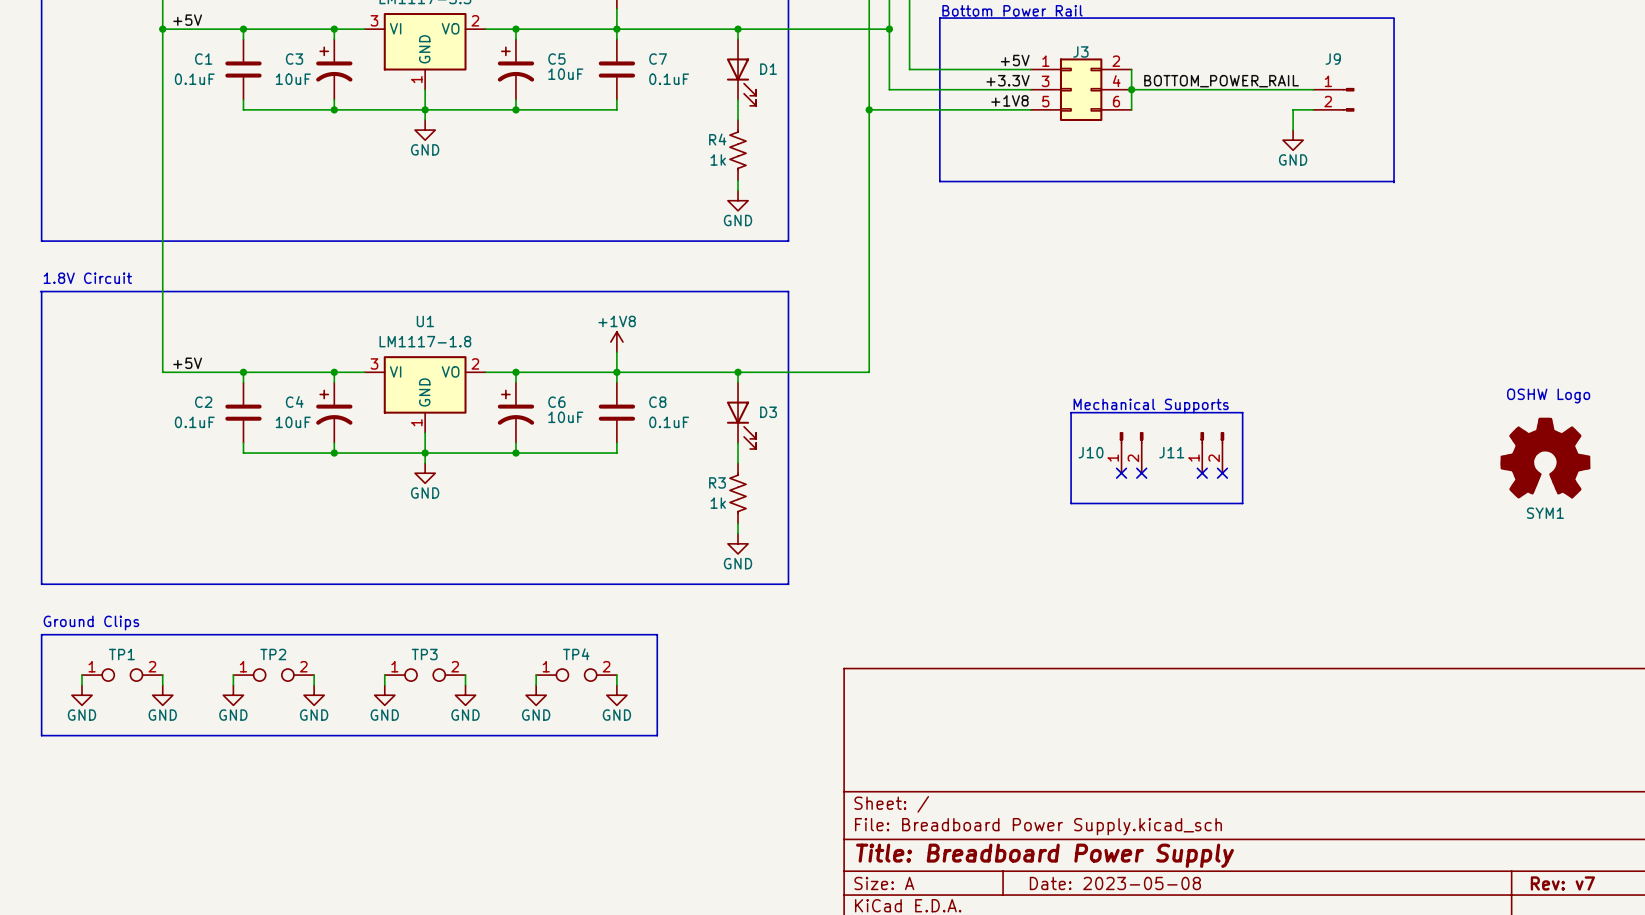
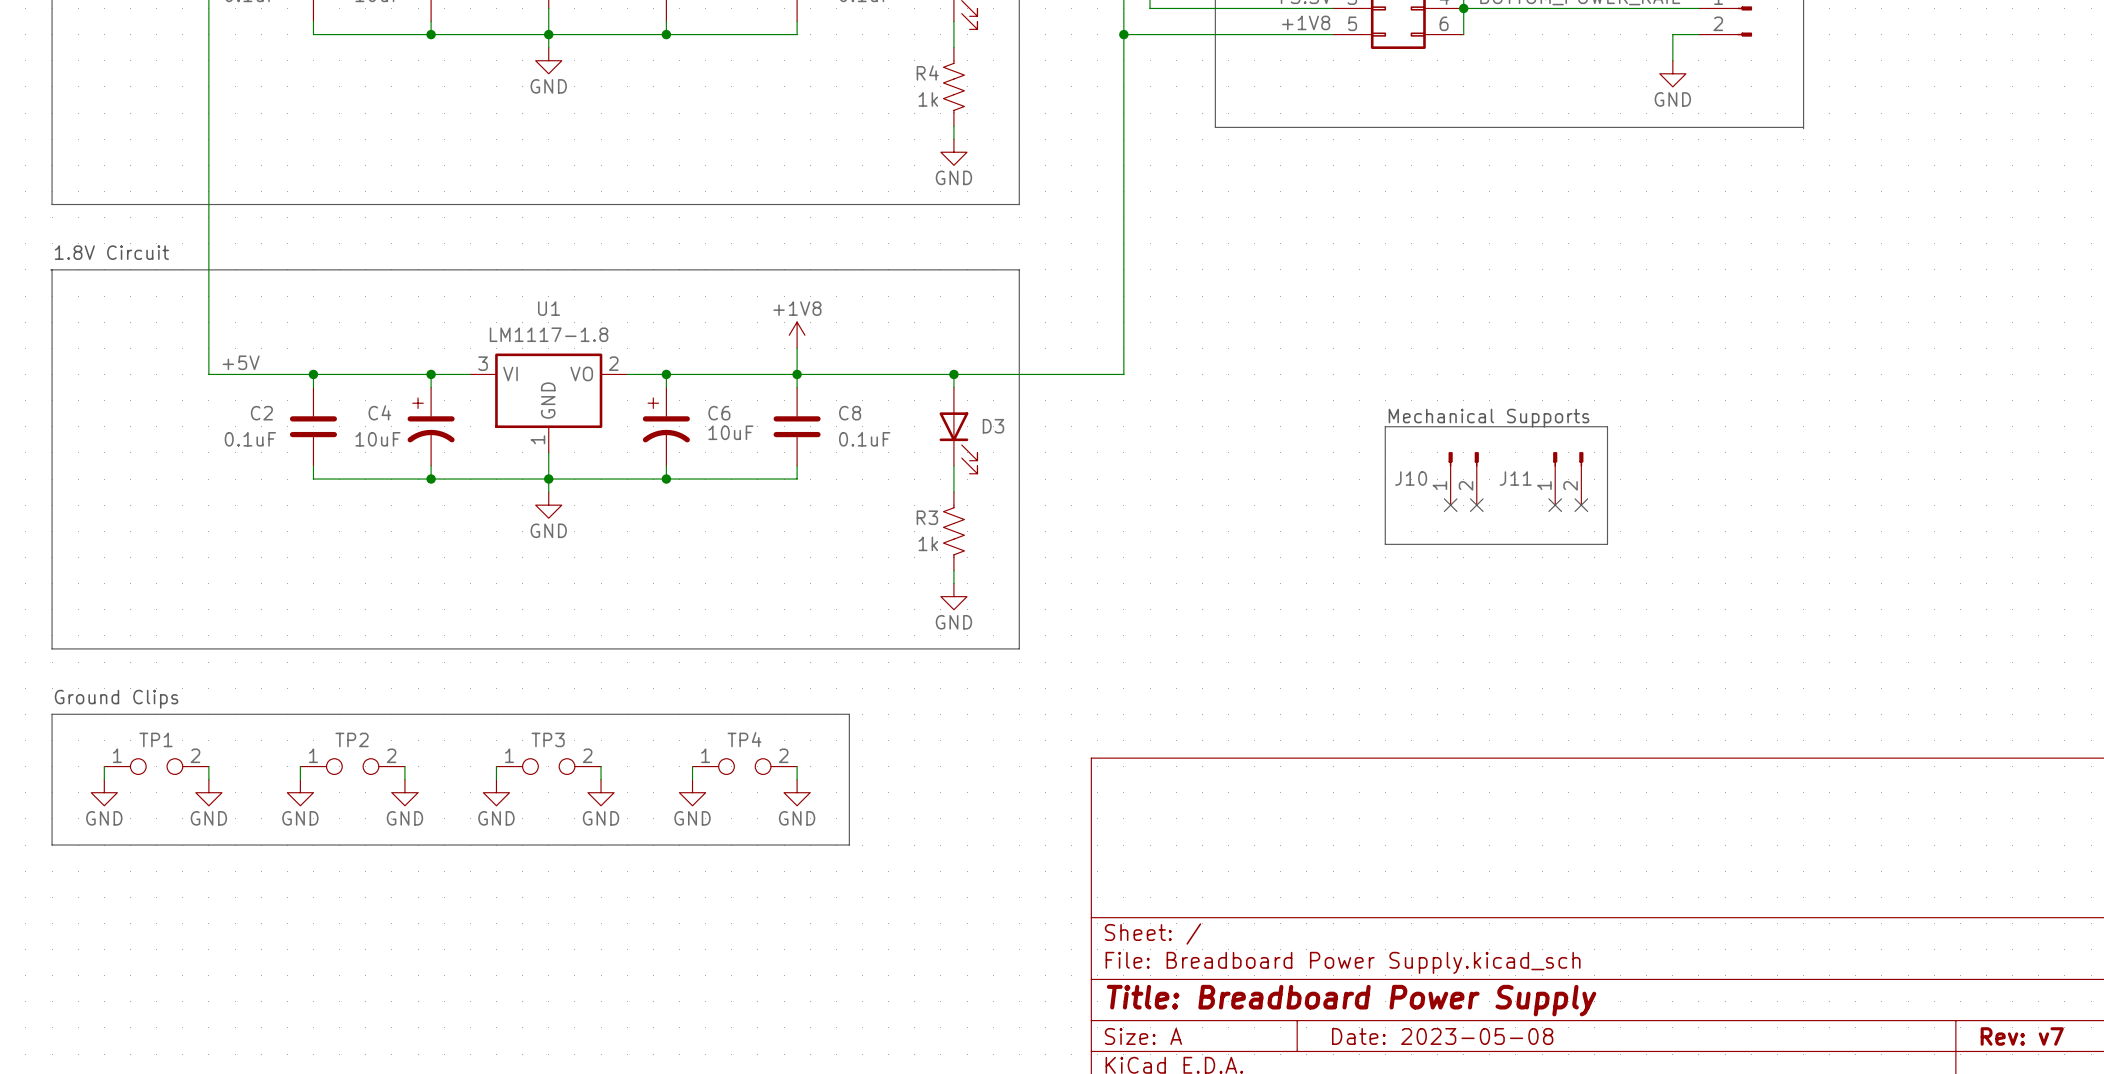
text: OSHW Logo (1548, 395) -> none
SYM1: (1545, 458) -> none

